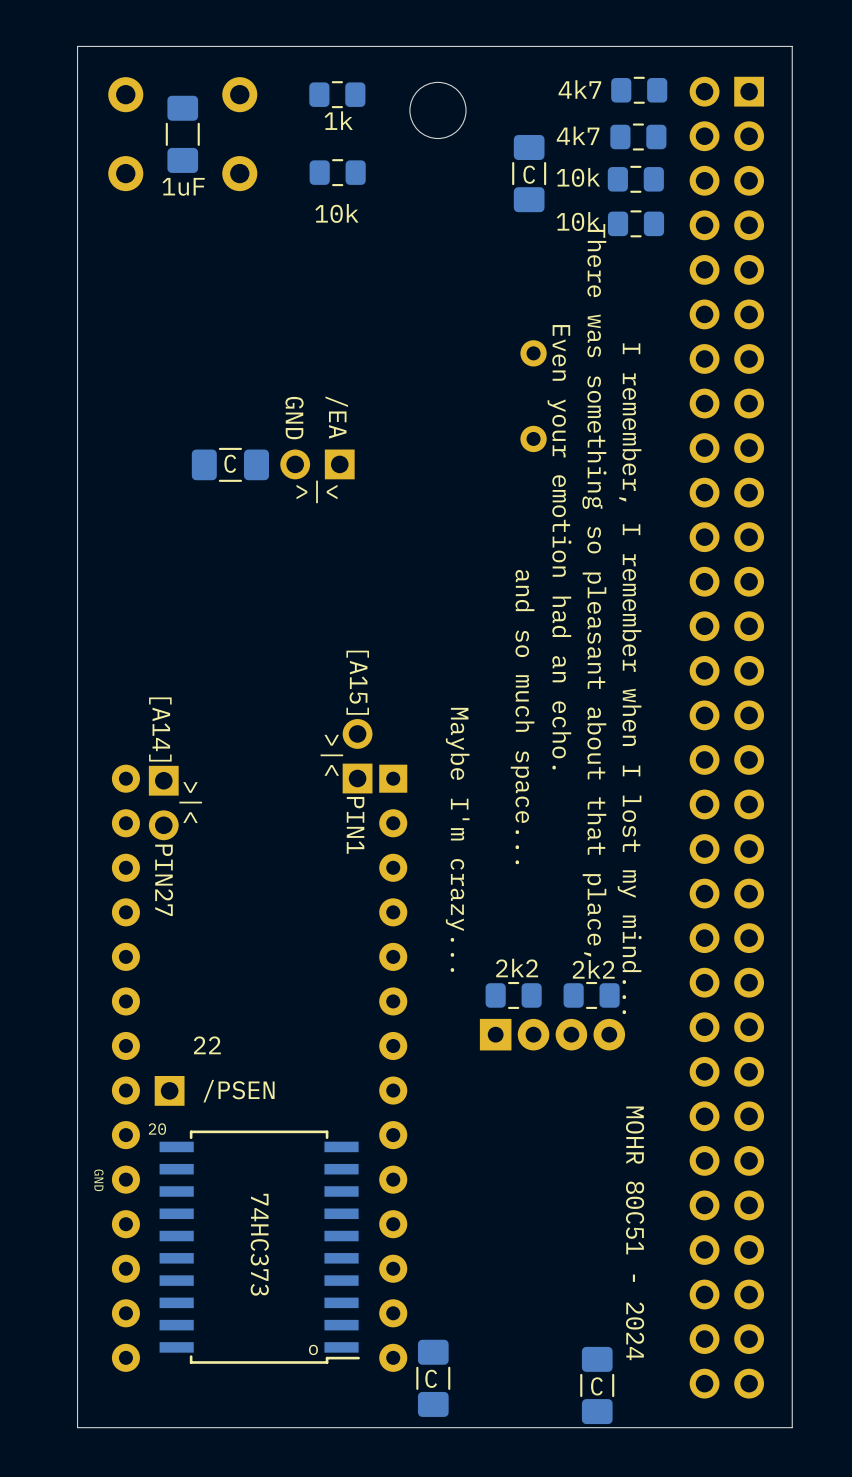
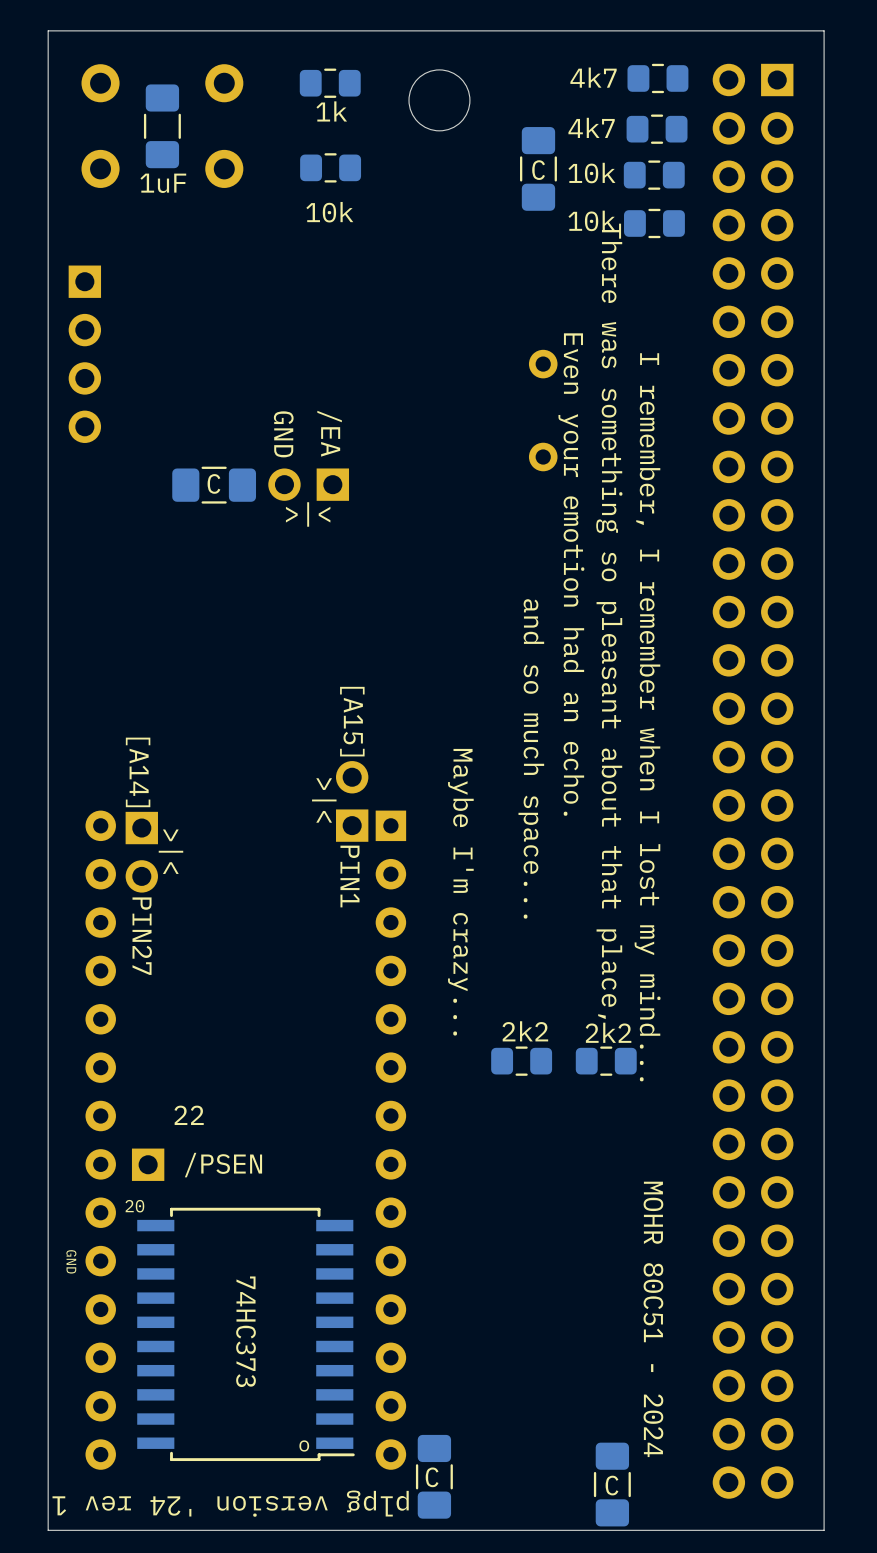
part: none -> (84, 354)
part: (552, 1034) -> none
text: none -> plpg version '24 rev 1 (230, 1503)

